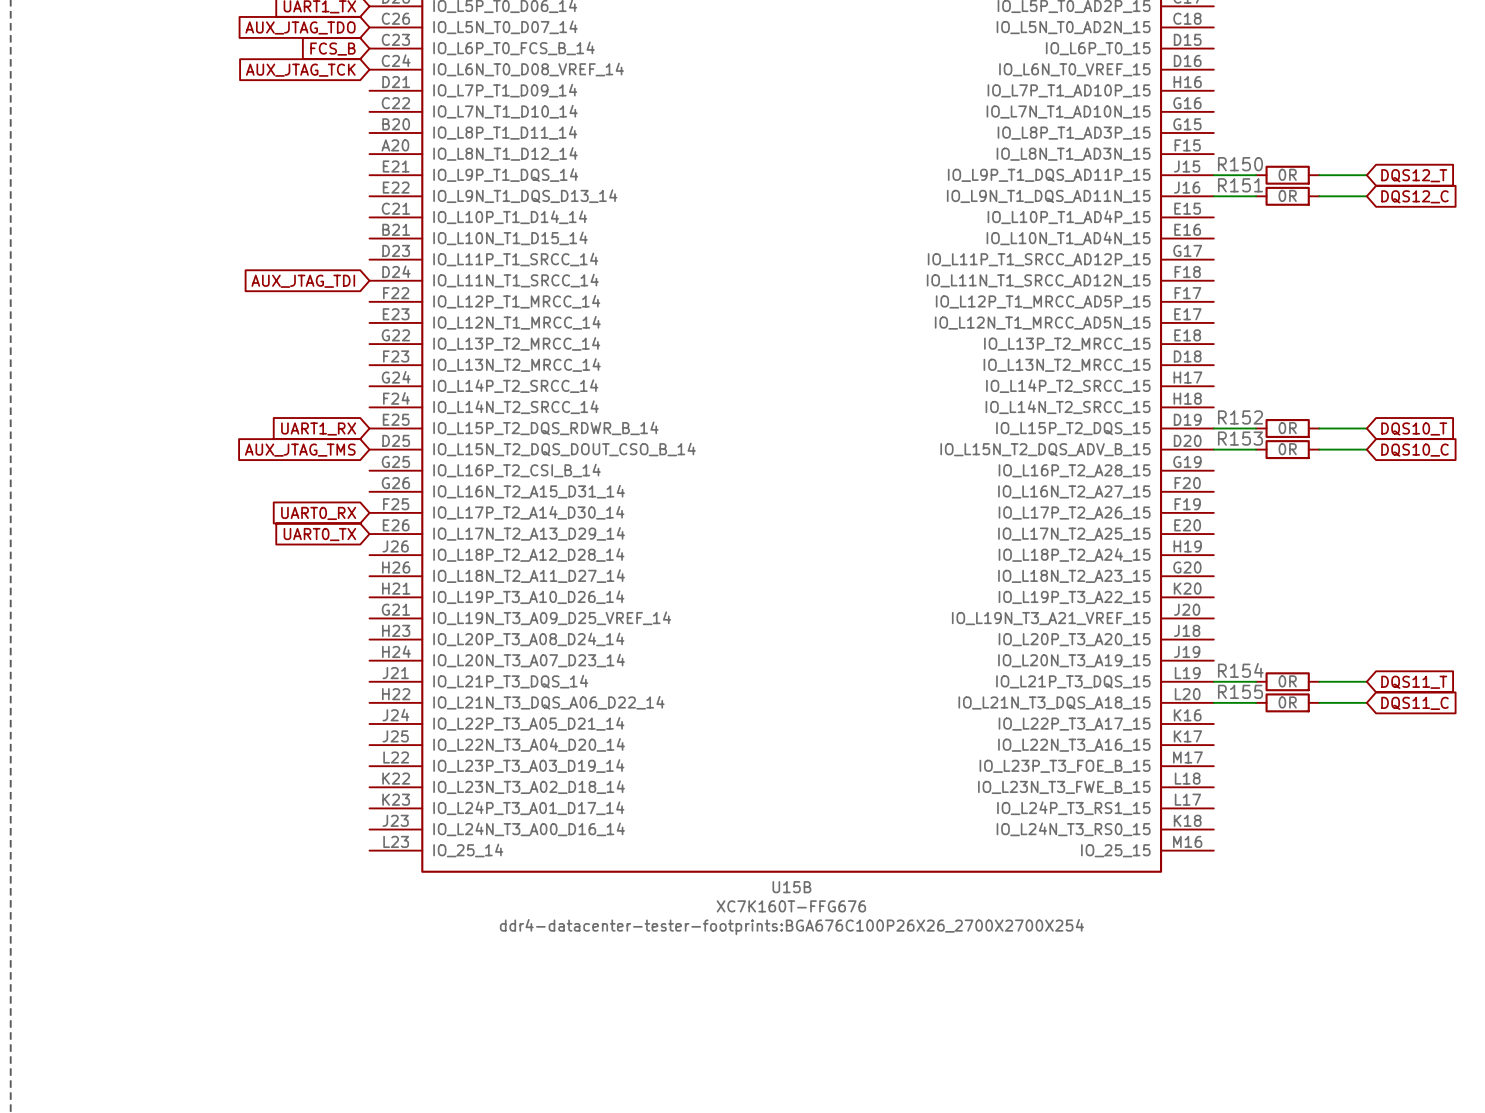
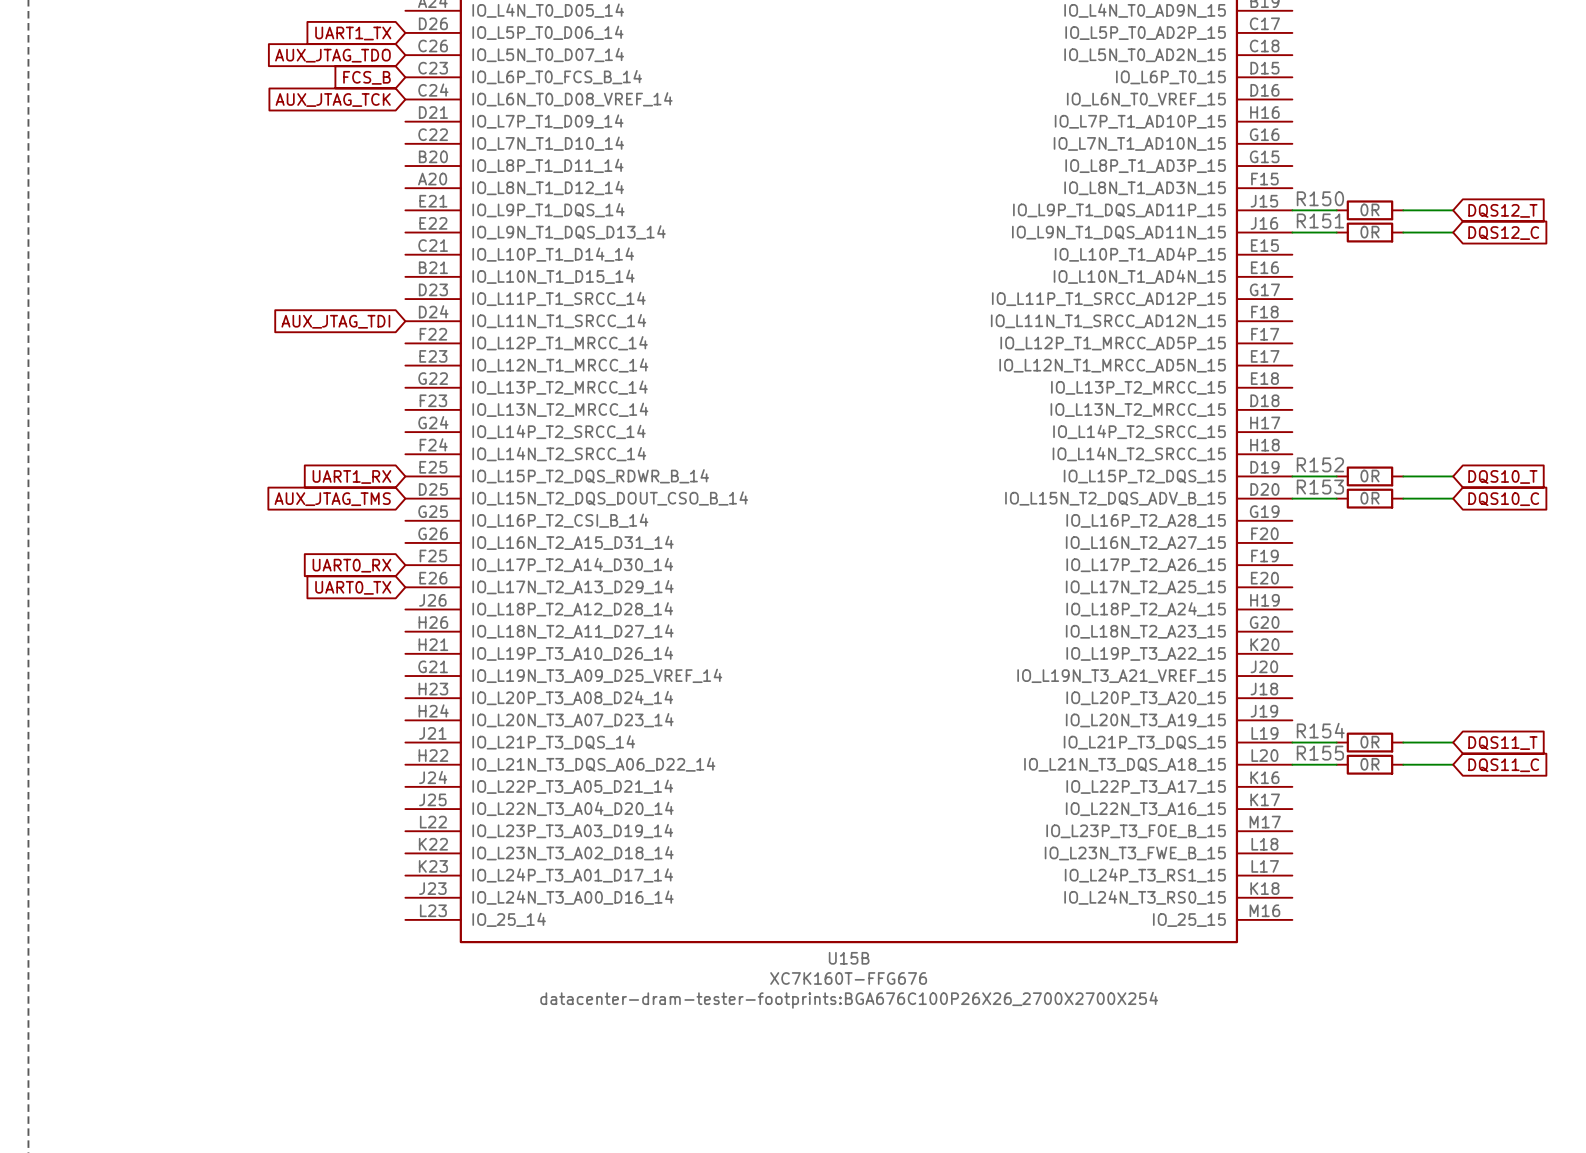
U15B text: ddr4-datacenter-tester-footprints:BGA676C100P26X26_2700X2700X254 (791, 927) -> datacenter-dram-tester-footprints:BGA676C100P26X26_2700X2700X254 (849, 1000)

